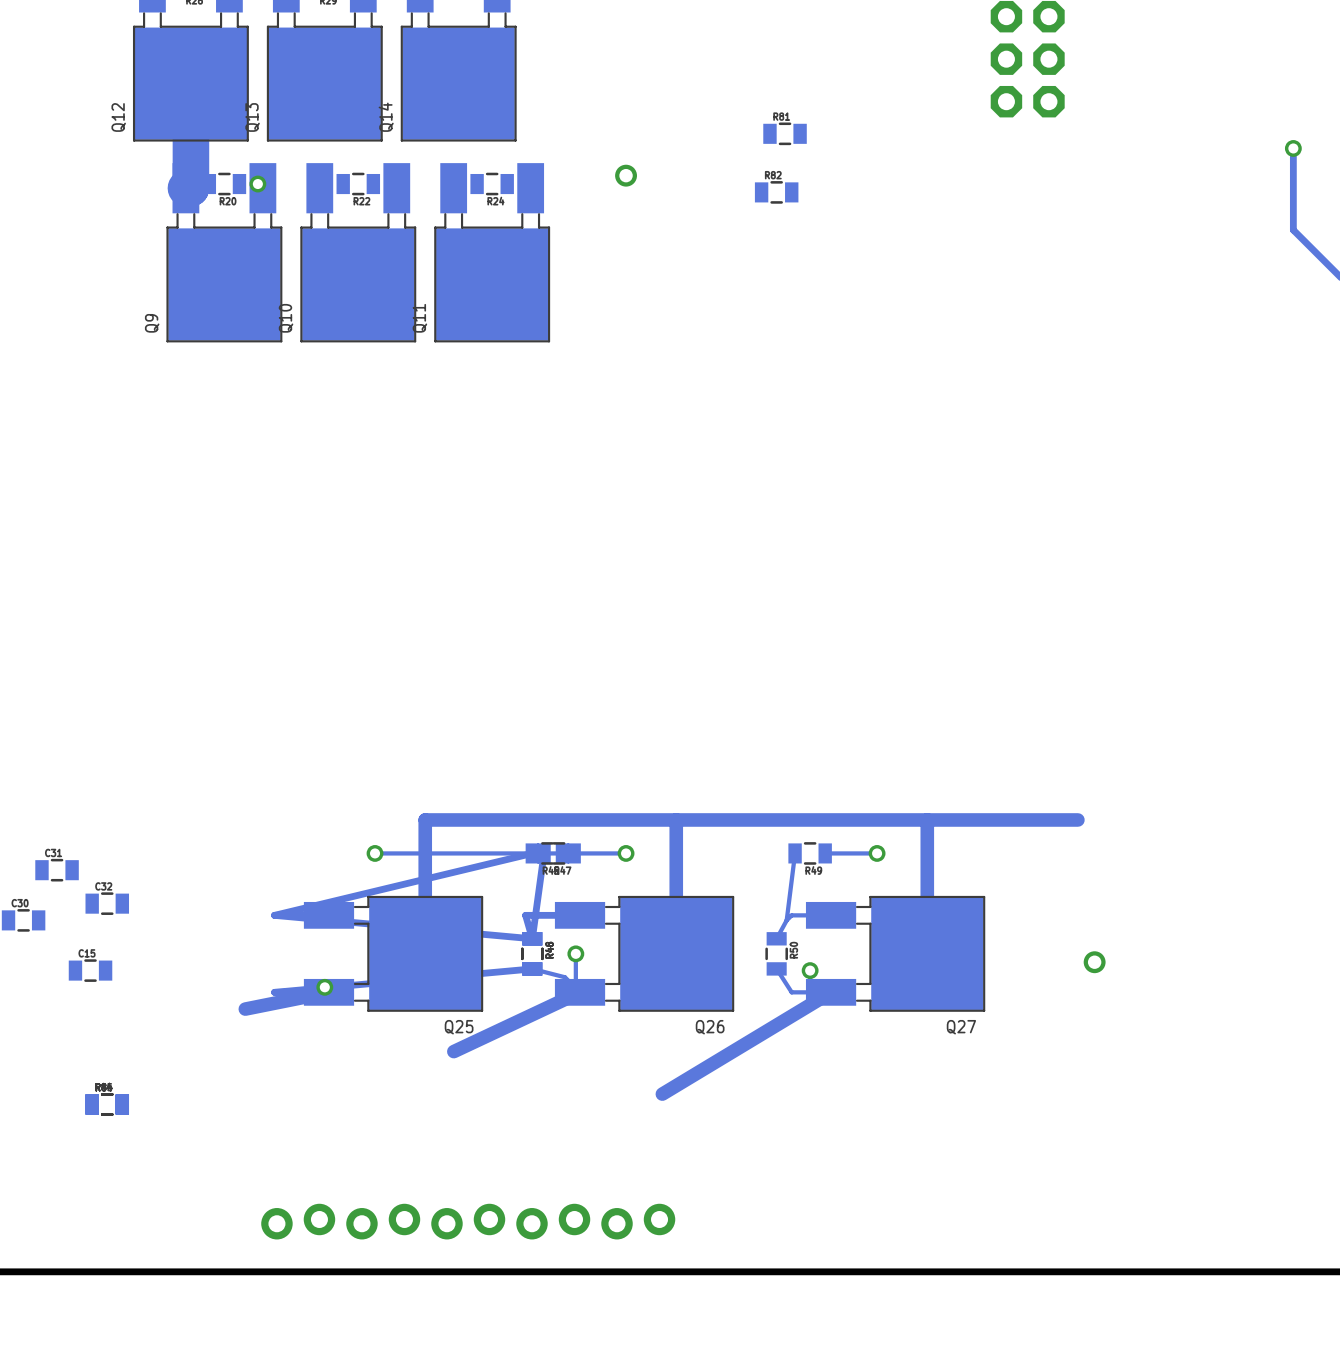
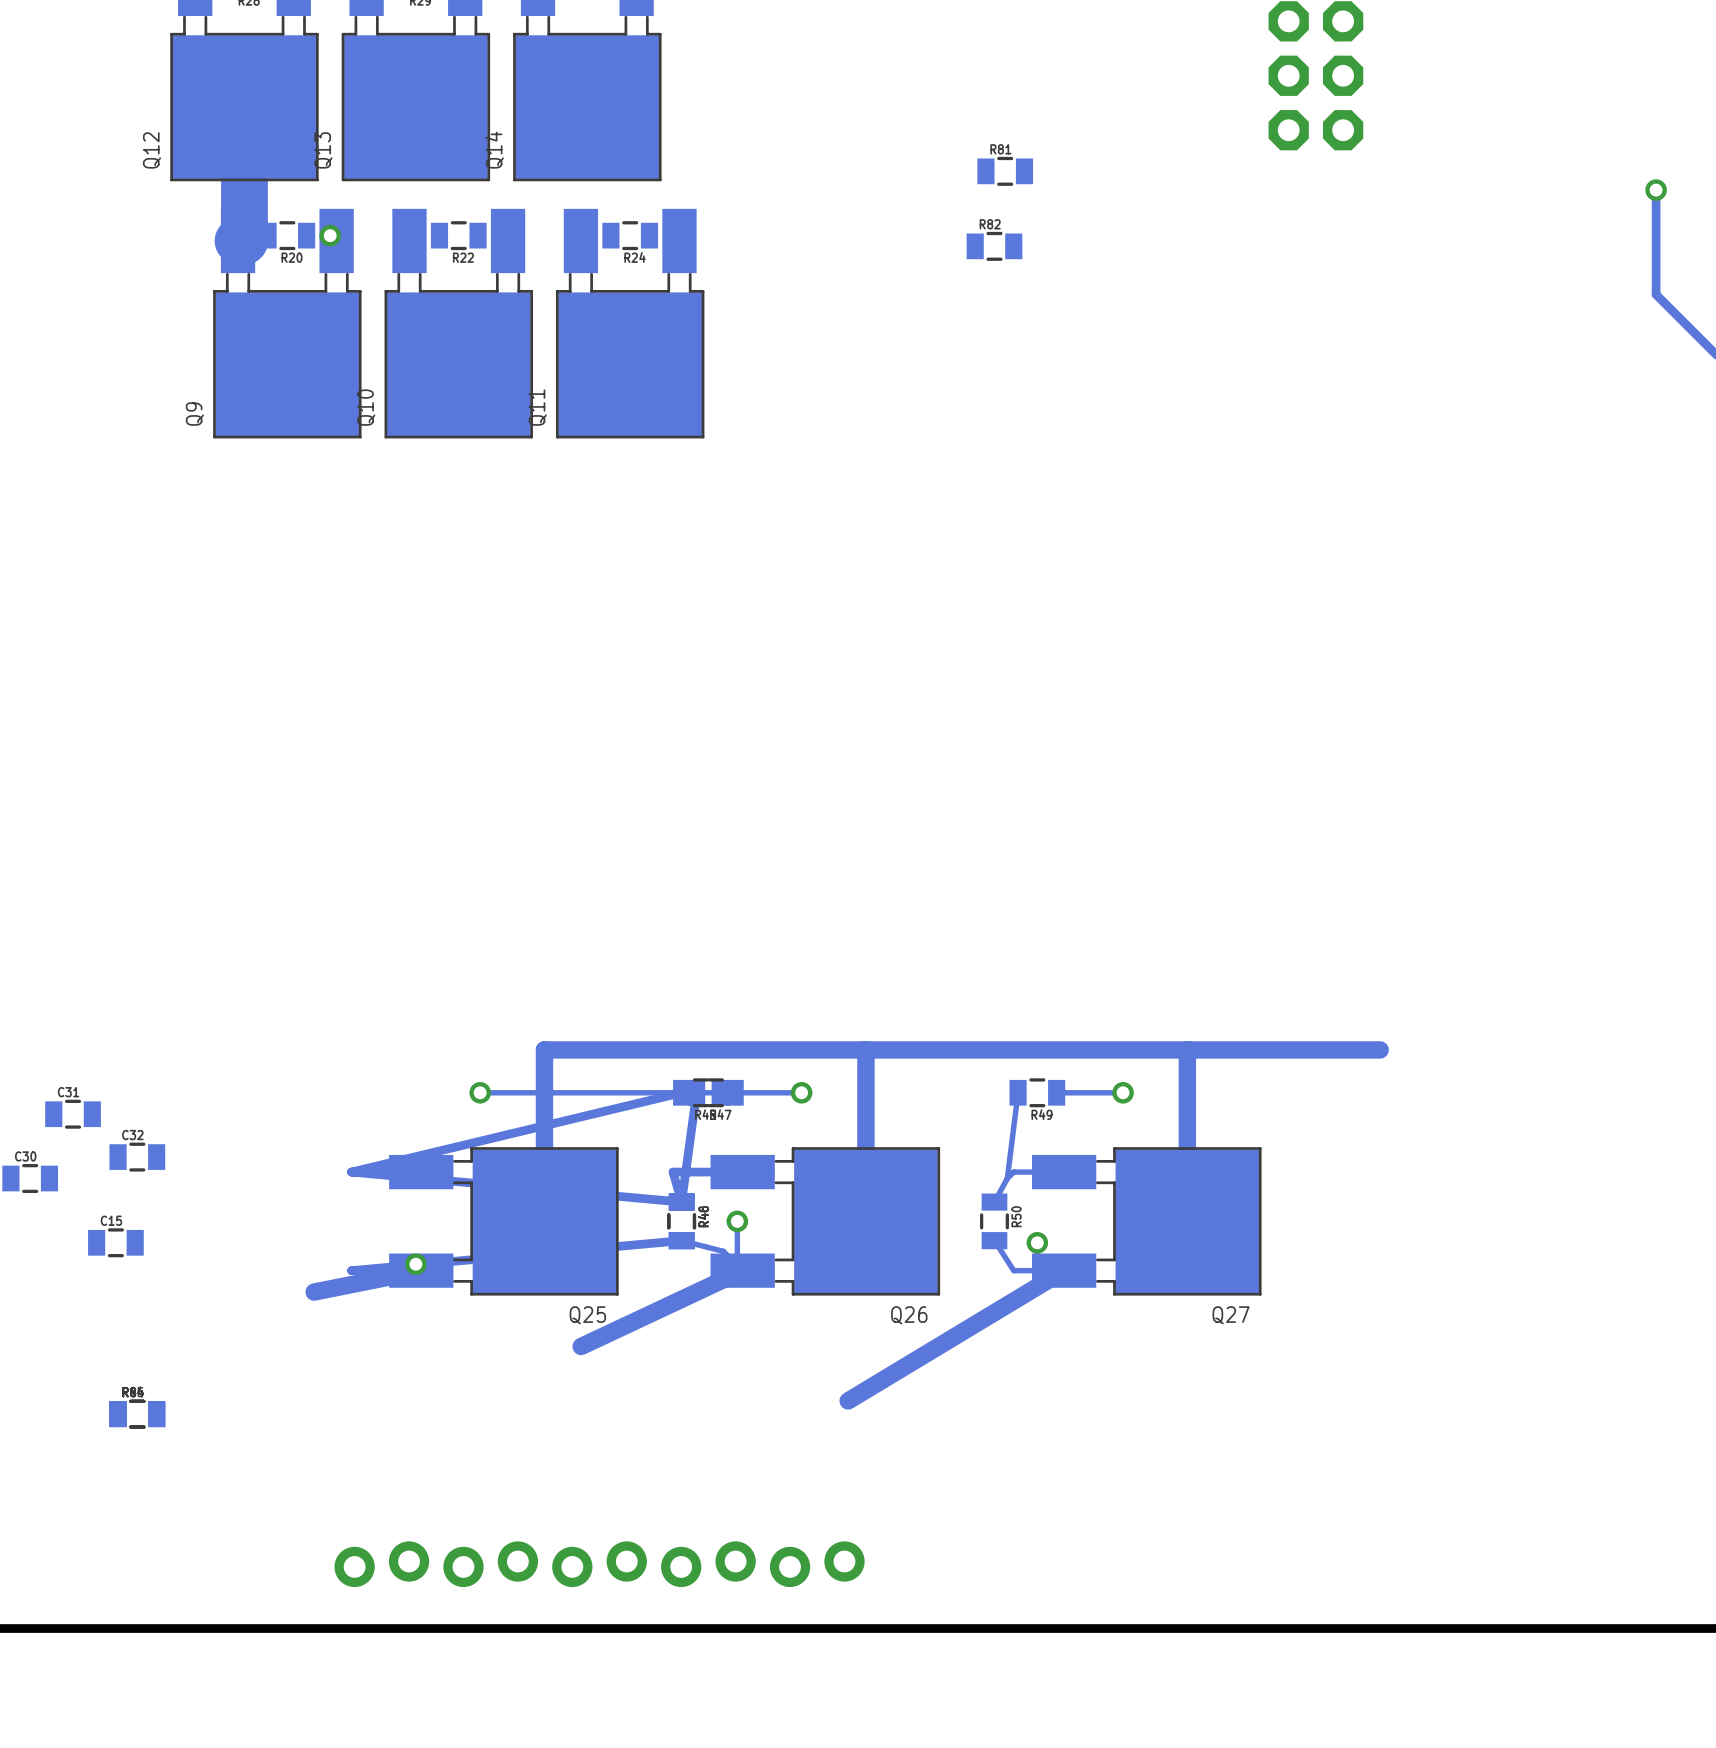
part: (626, 175) -> none
part: (1094, 962) -> none

